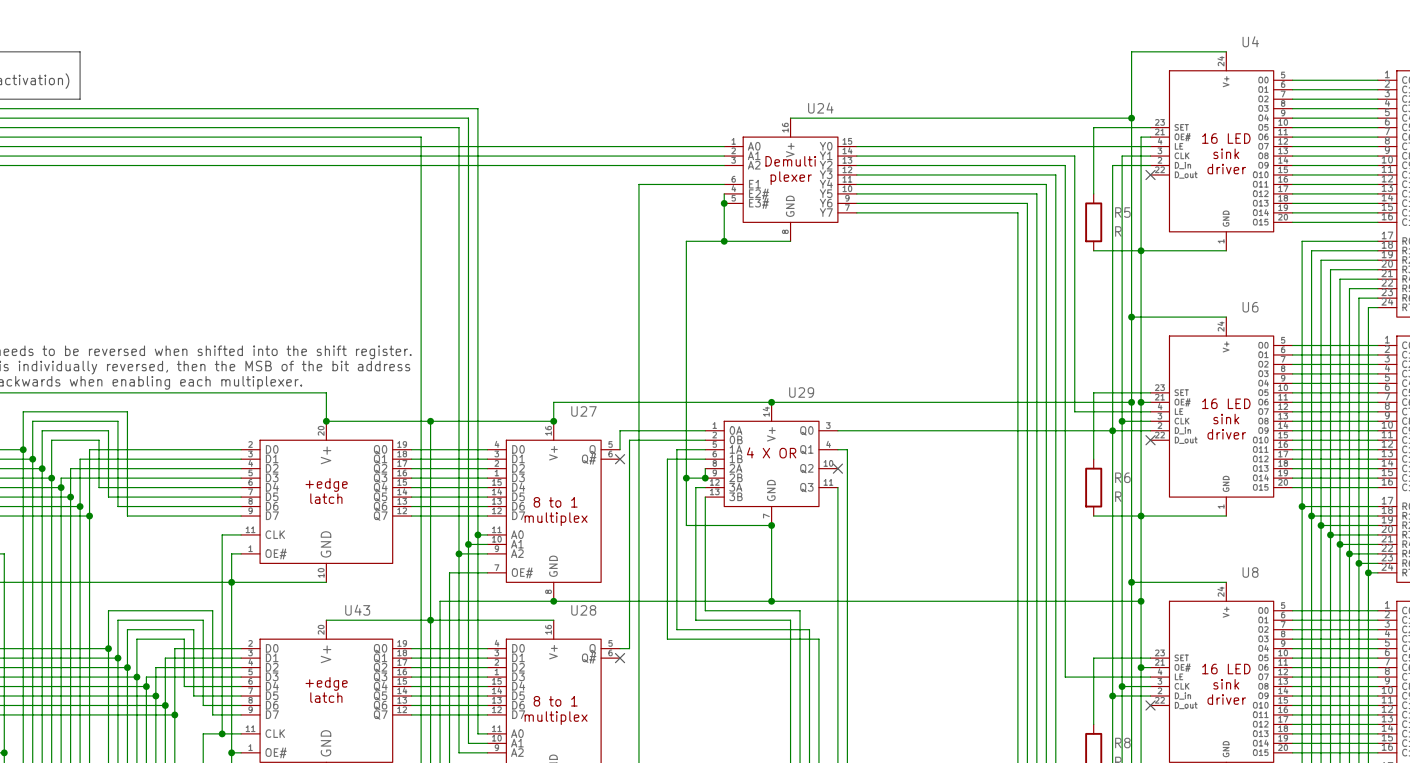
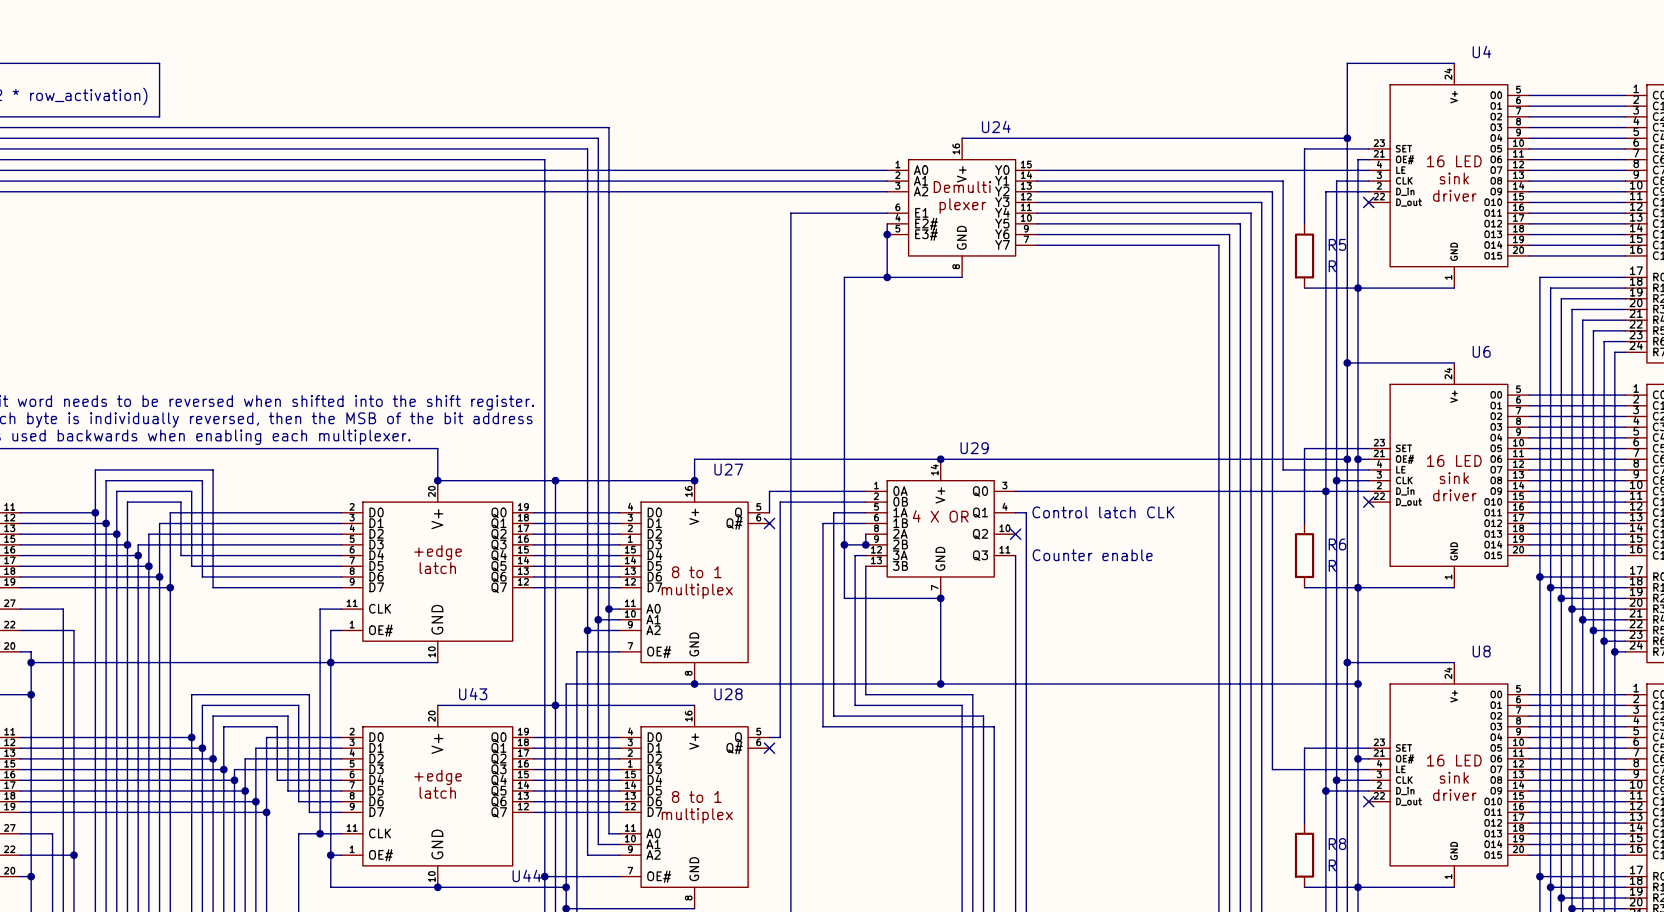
text: none -> Control latch CLK (1103, 512)
text: none -> Counter enable (1092, 555)

